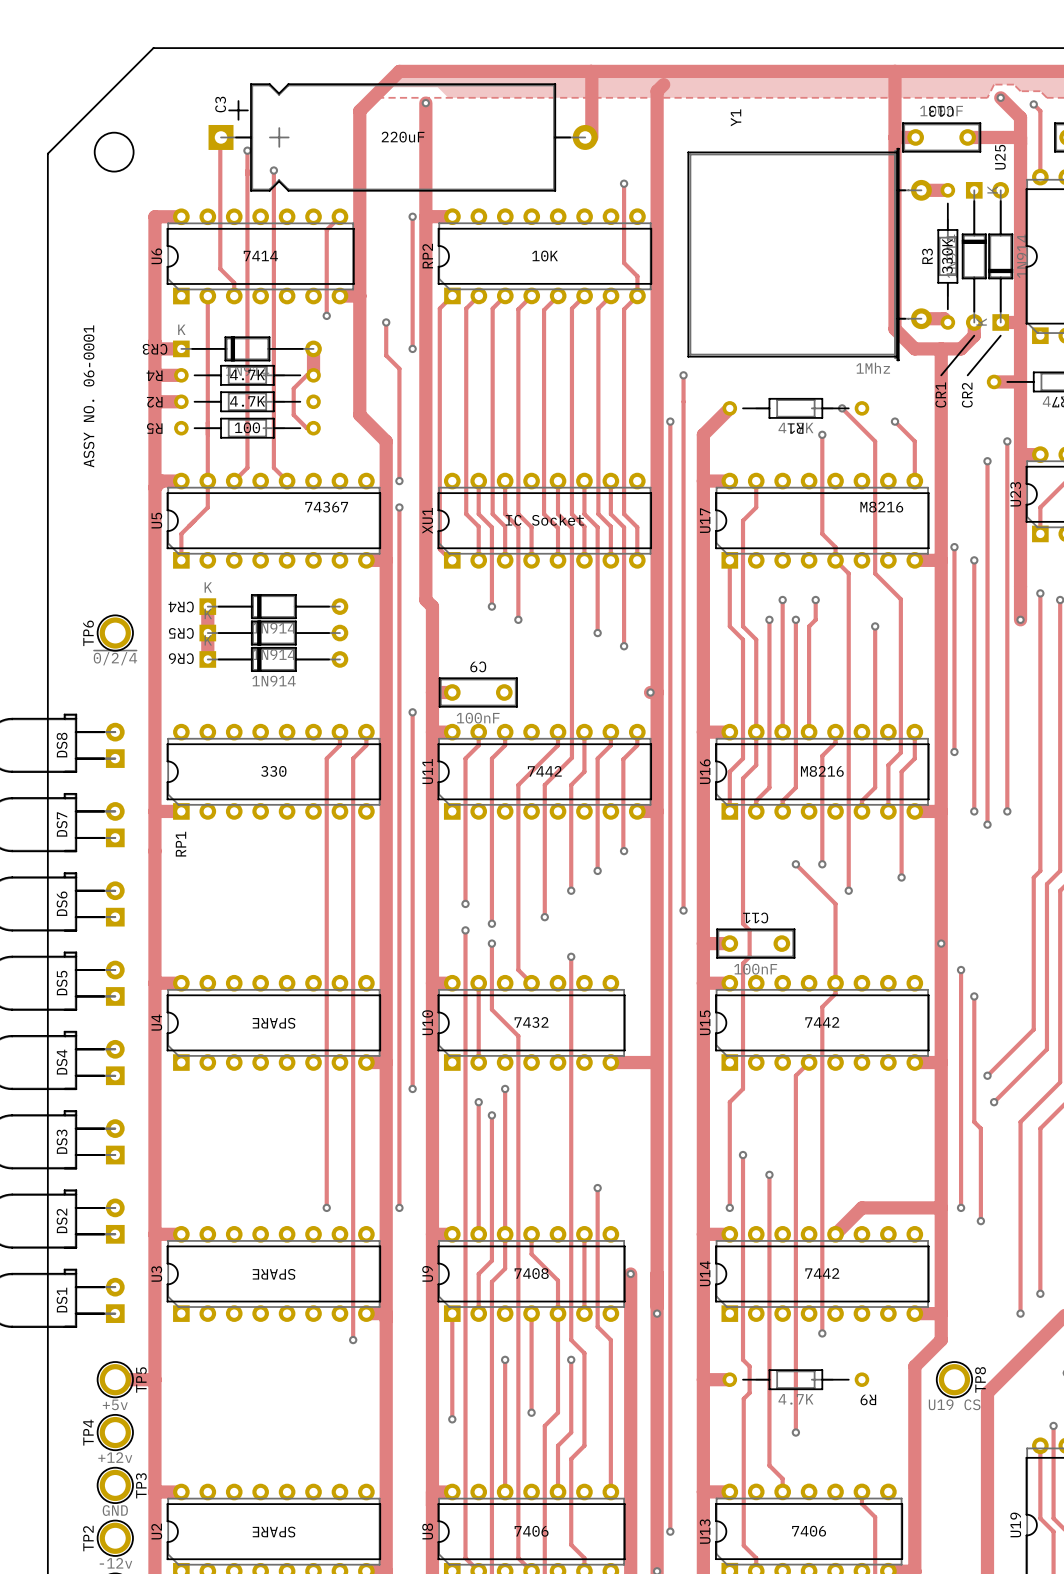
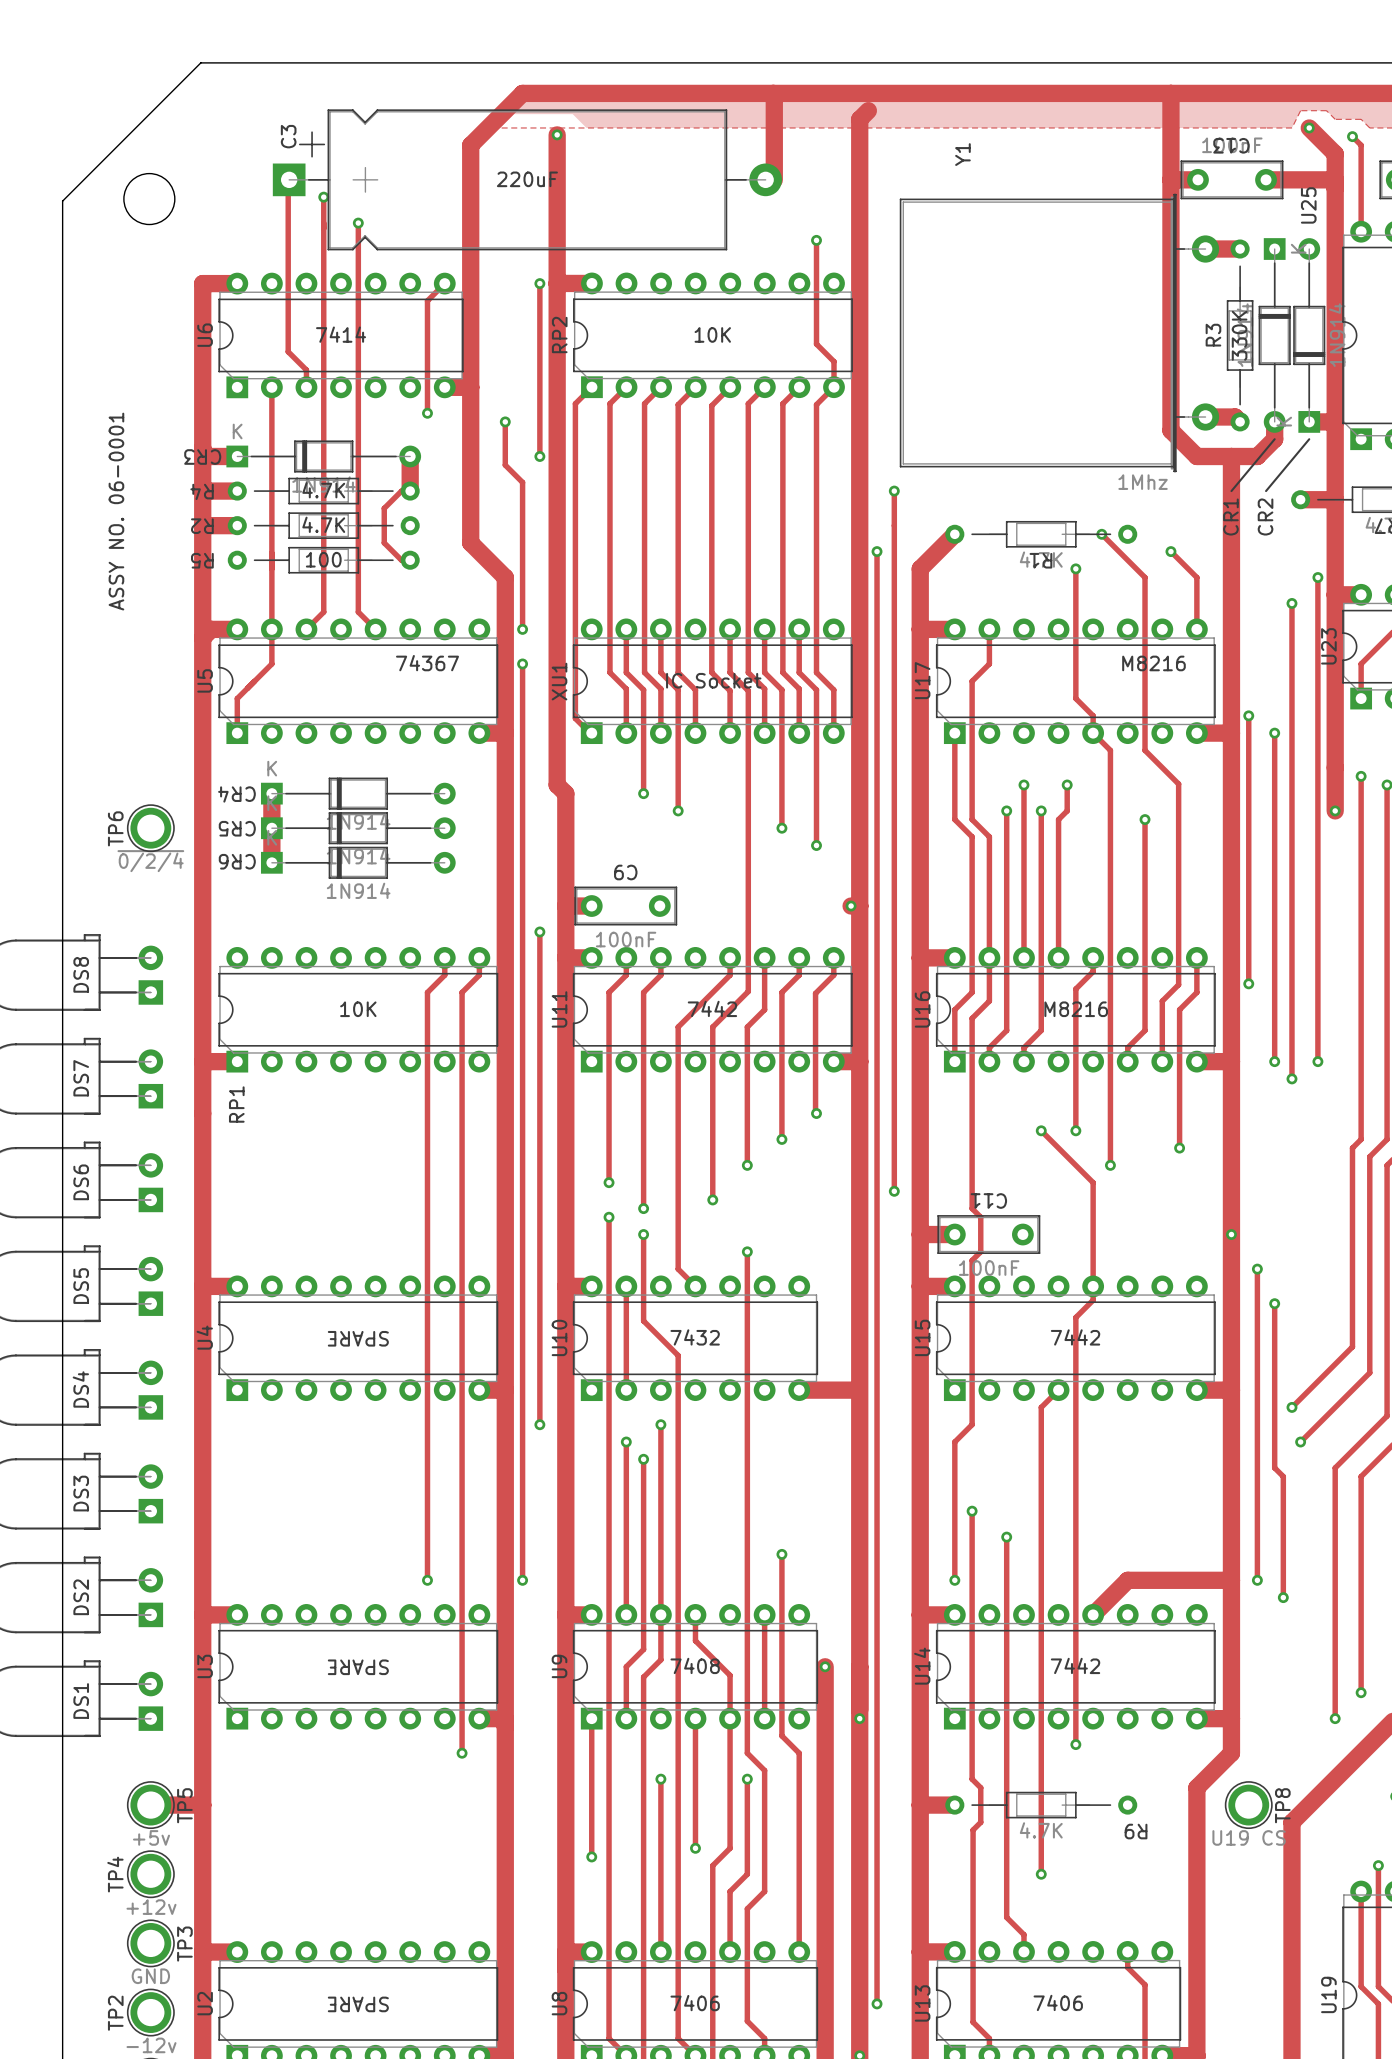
RP1 value: 330 (273, 771) -> 10K (358, 1009)

